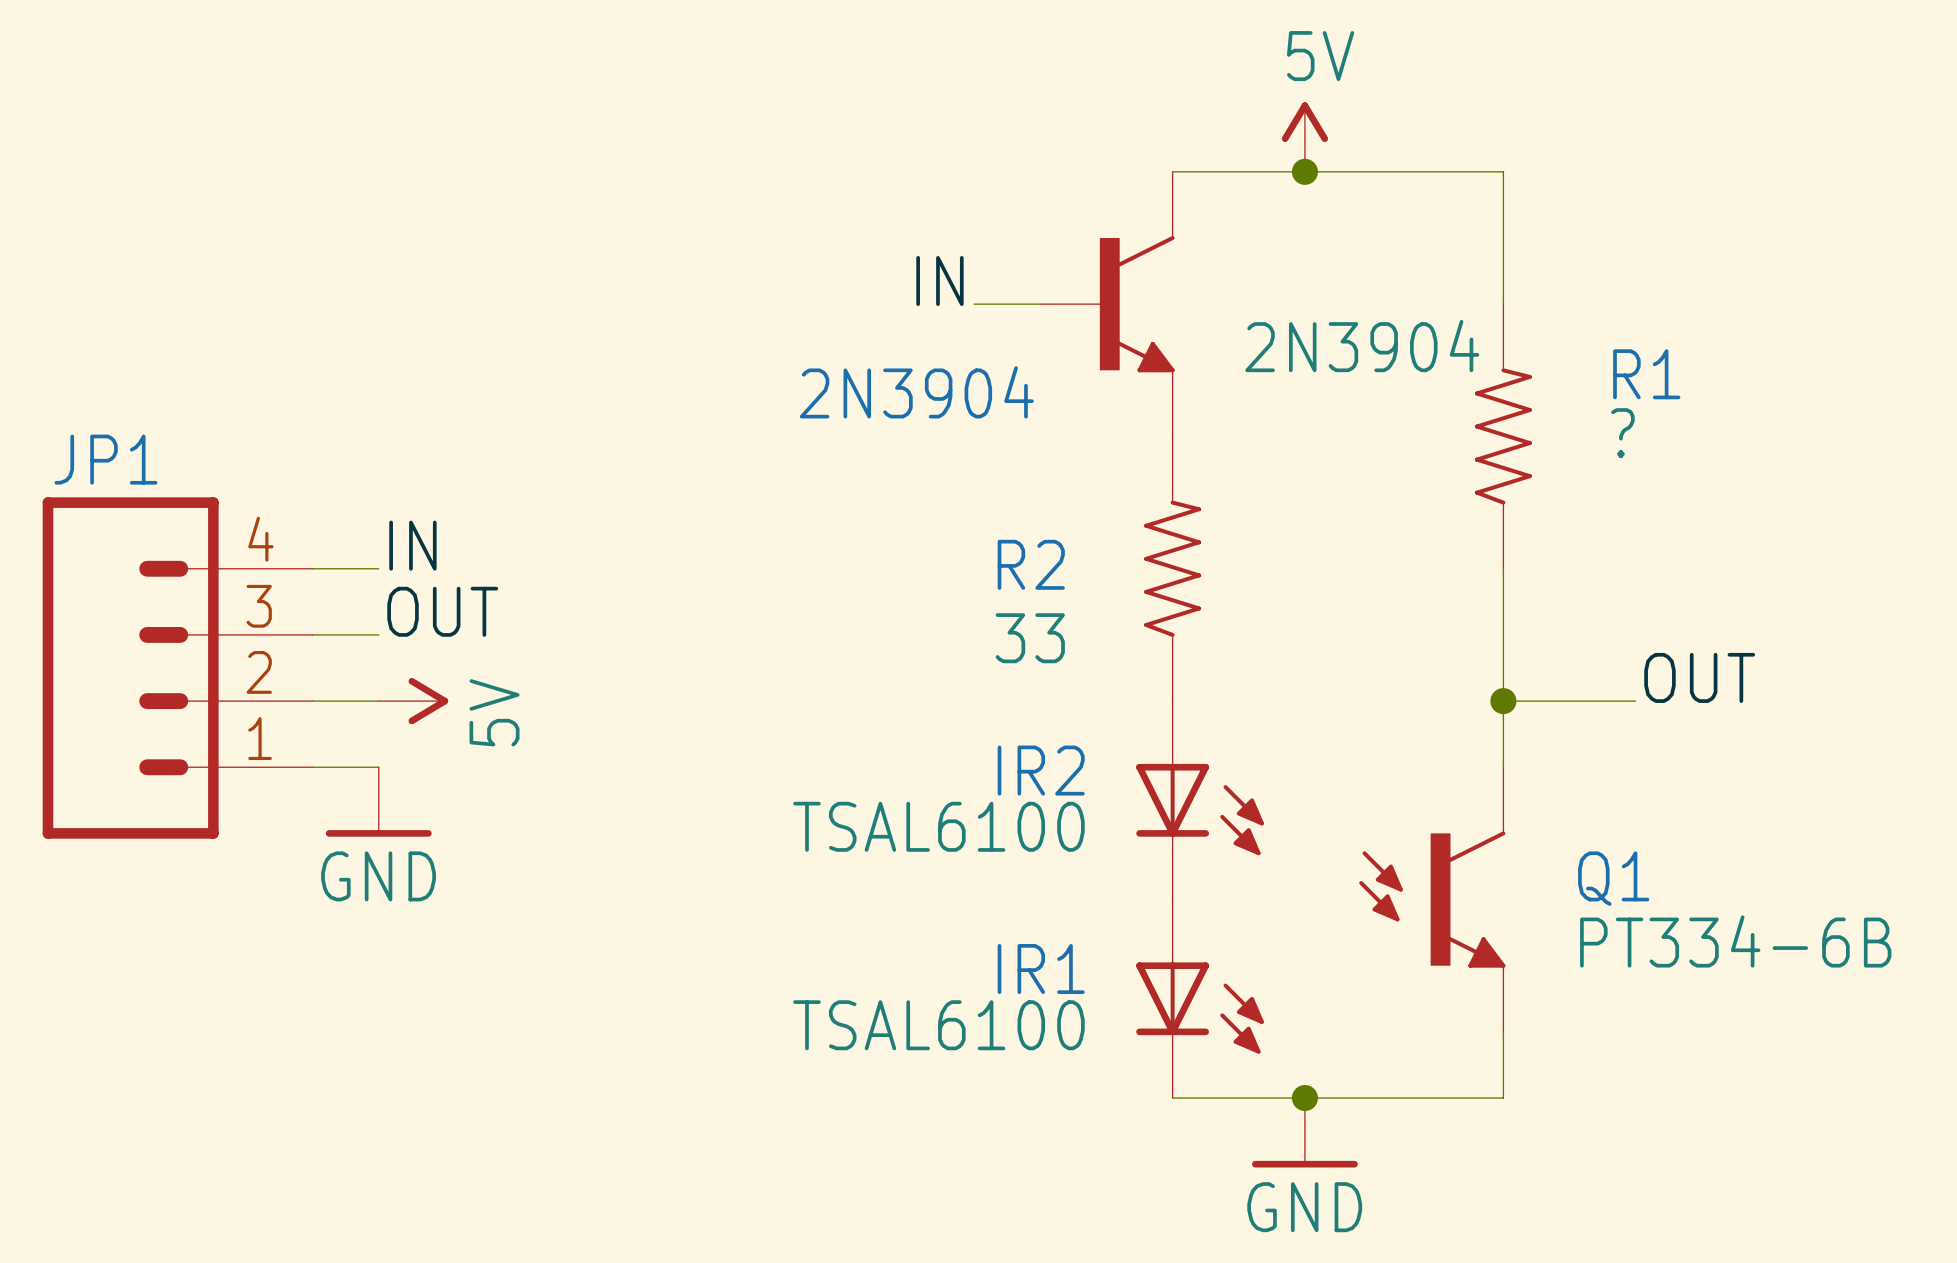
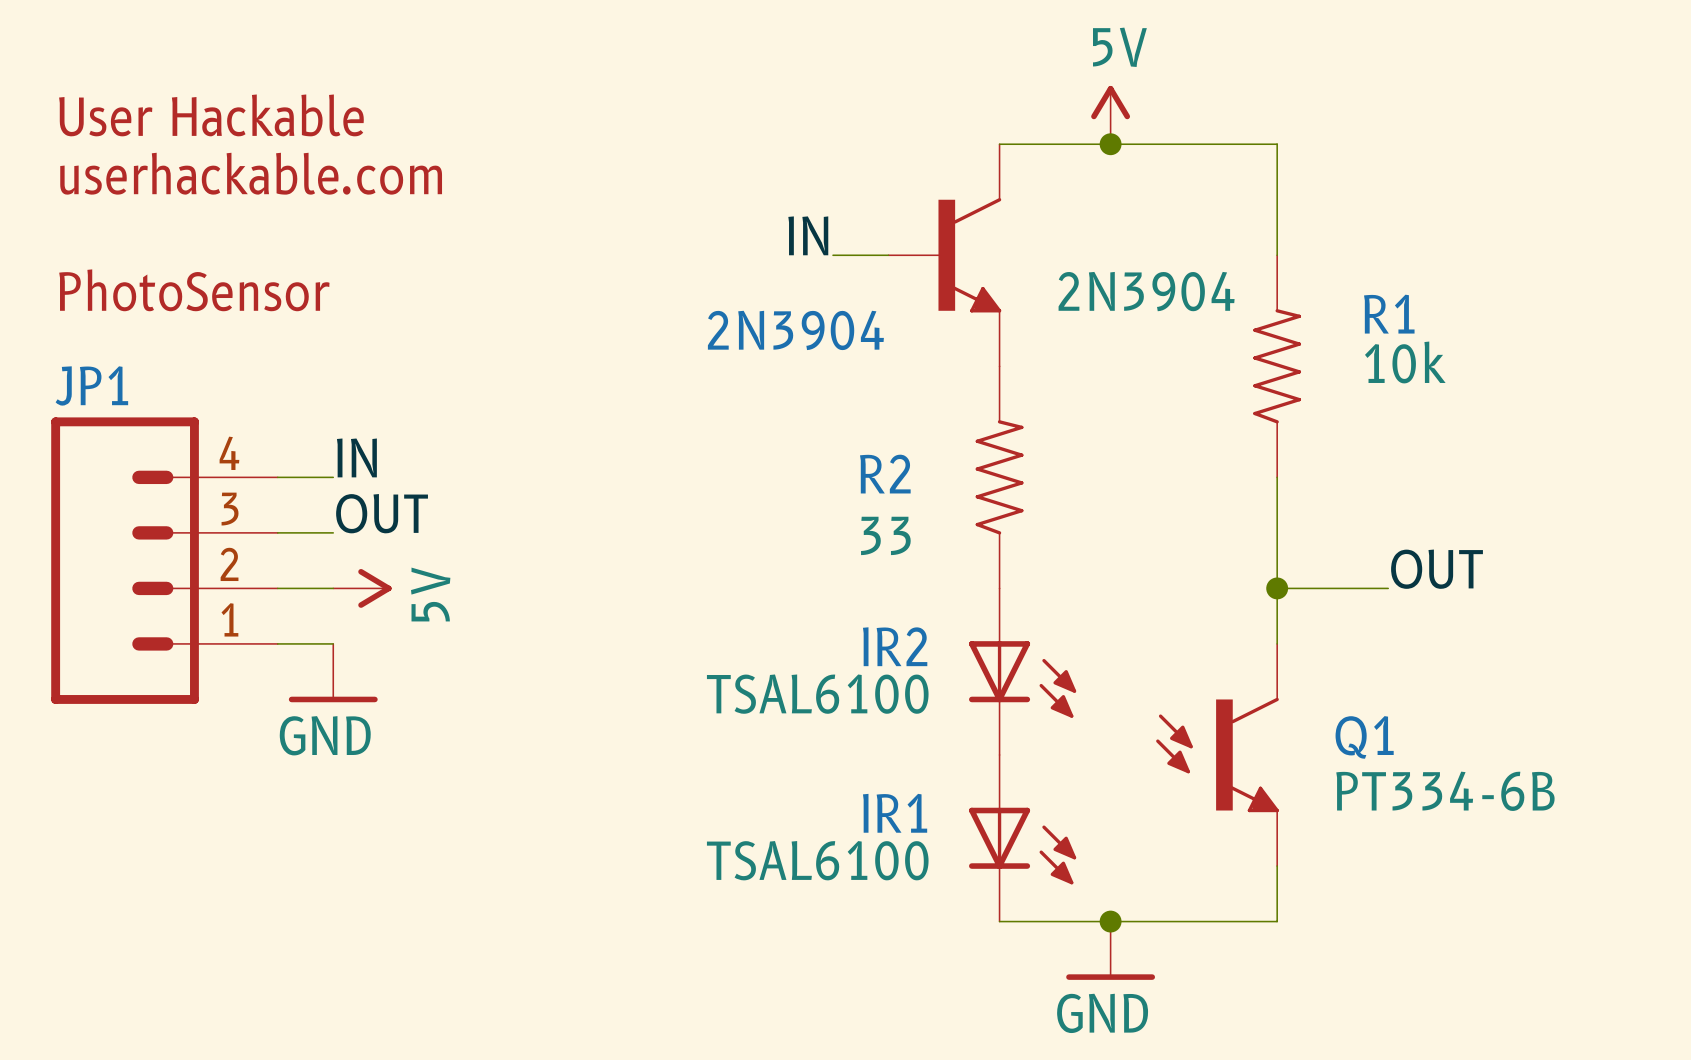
text: none -> User Hackable (211, 115)
text: none -> userhackable.com (251, 173)
text: none -> PhotoSensor (194, 290)
R1 value: ? (1622, 433) -> 10k (1405, 362)

